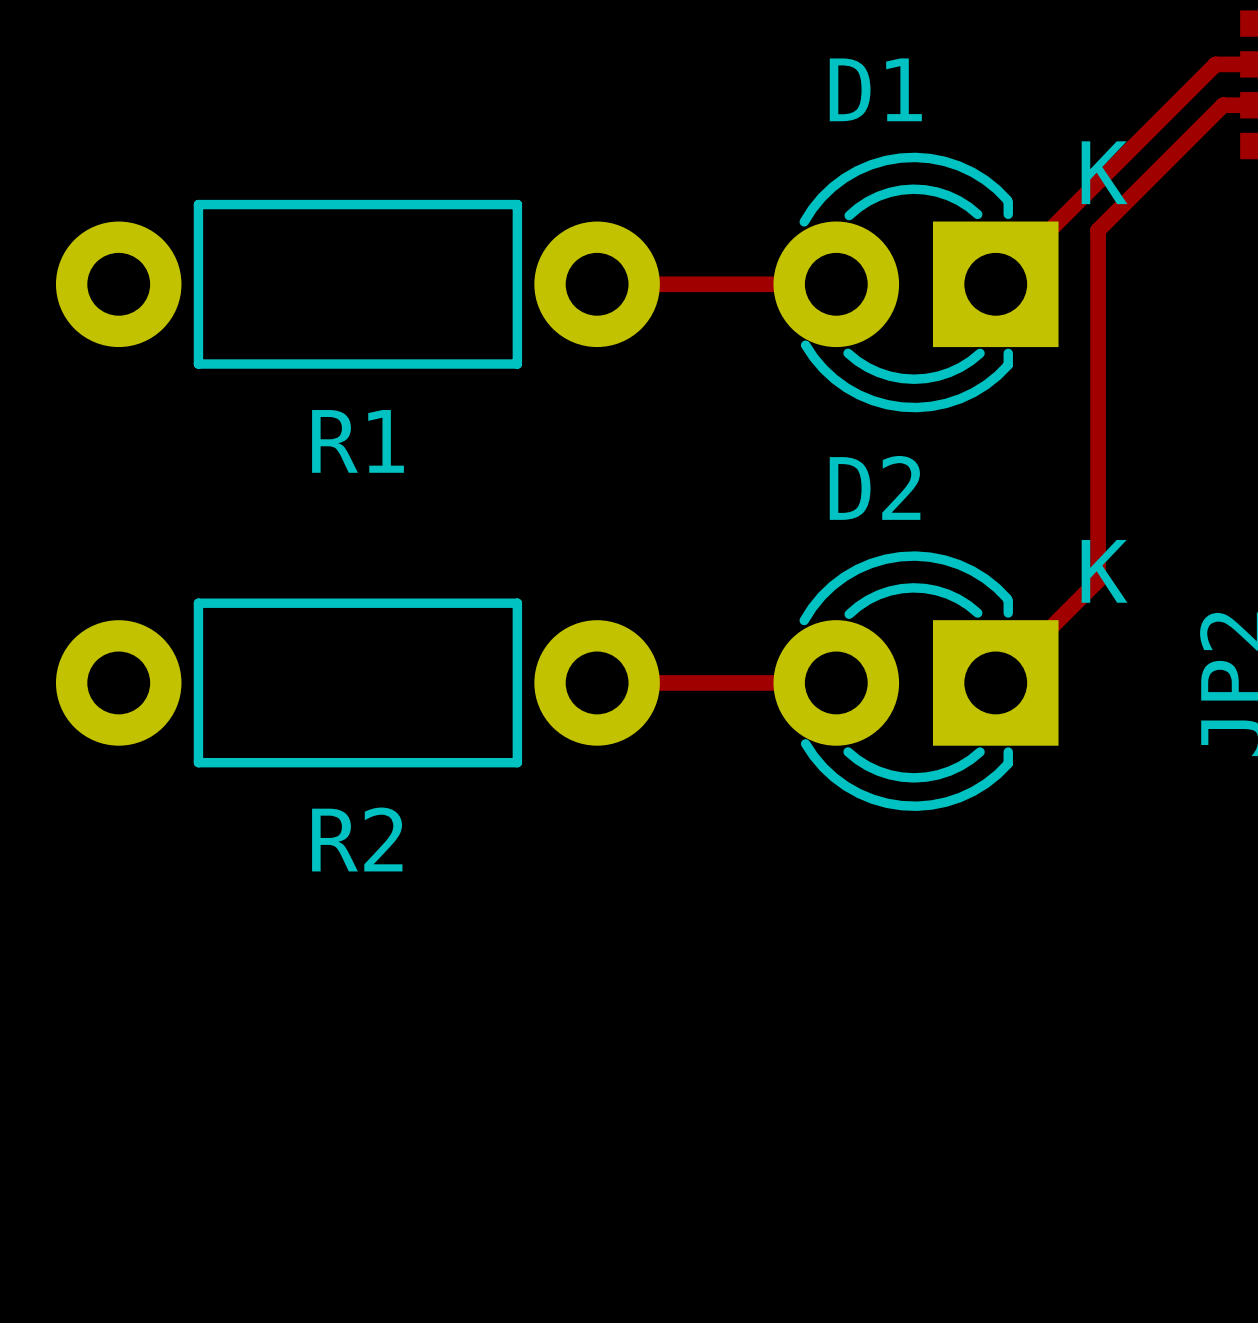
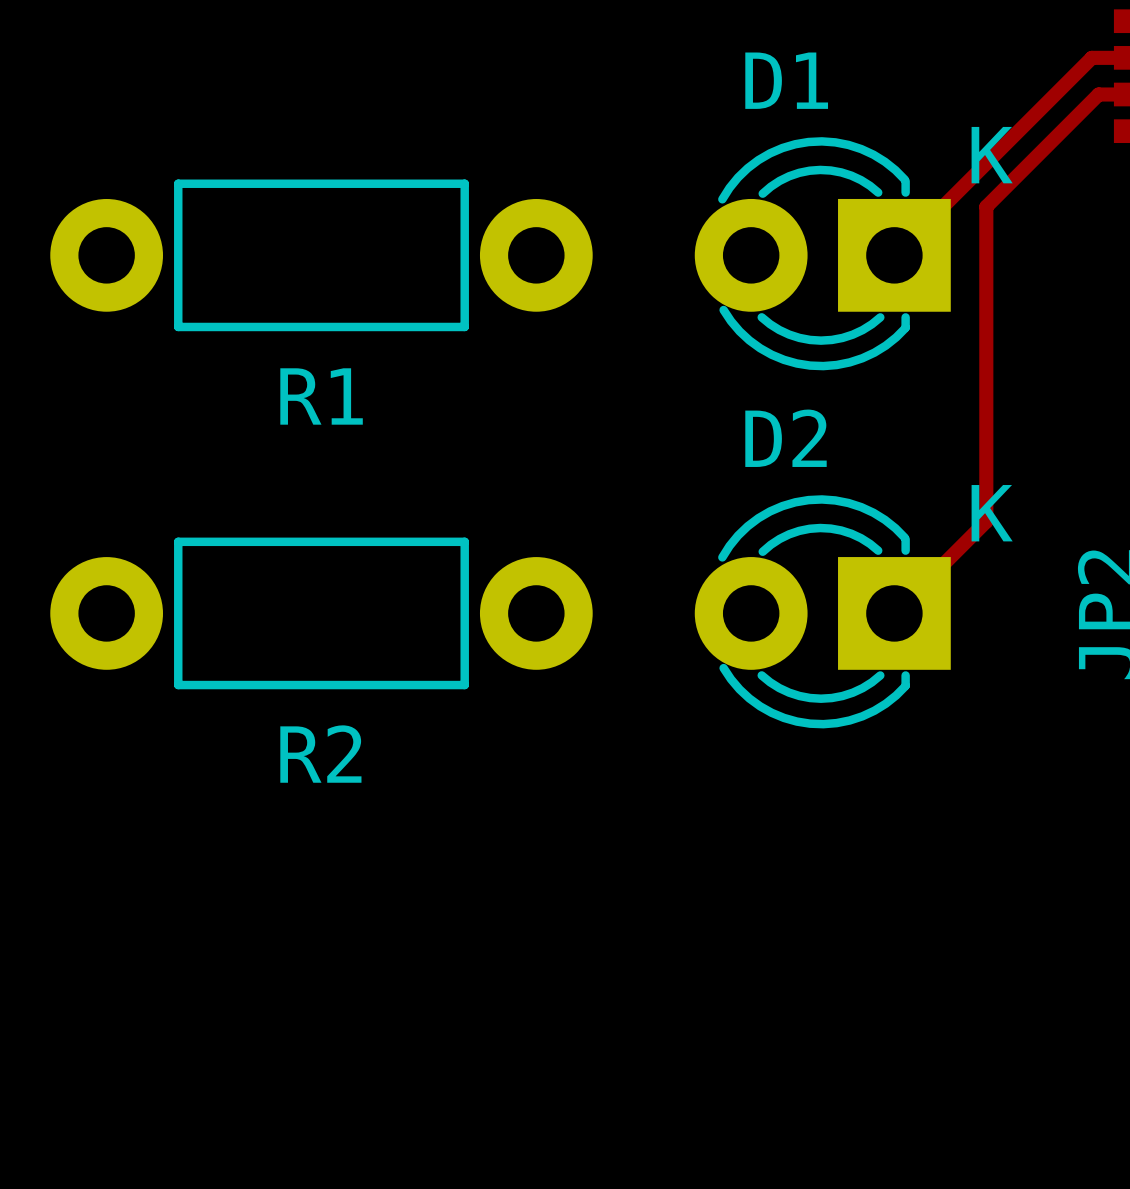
top track: (597, 284) (836, 284) -> none
top track: (597, 682) (836, 682) -> none

